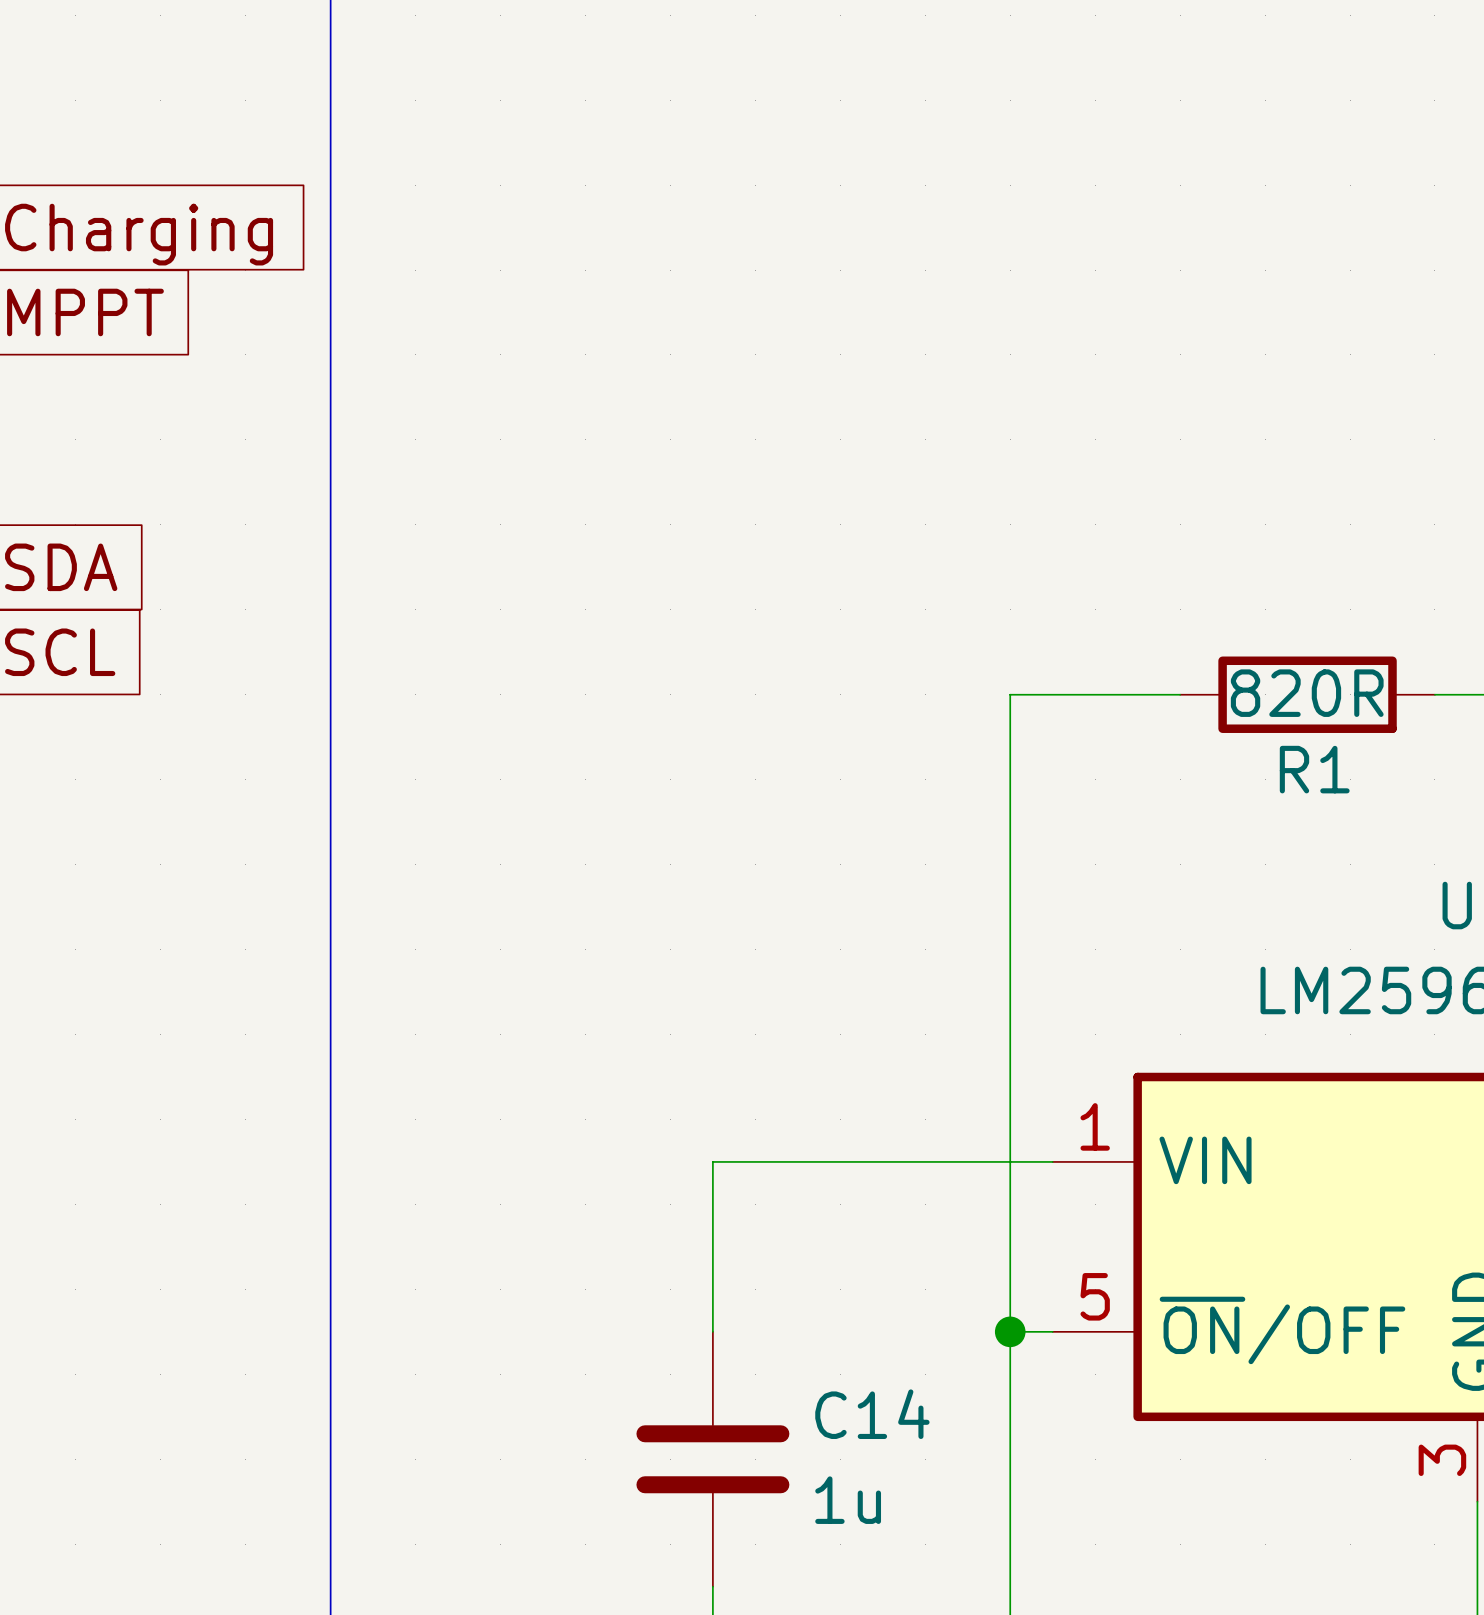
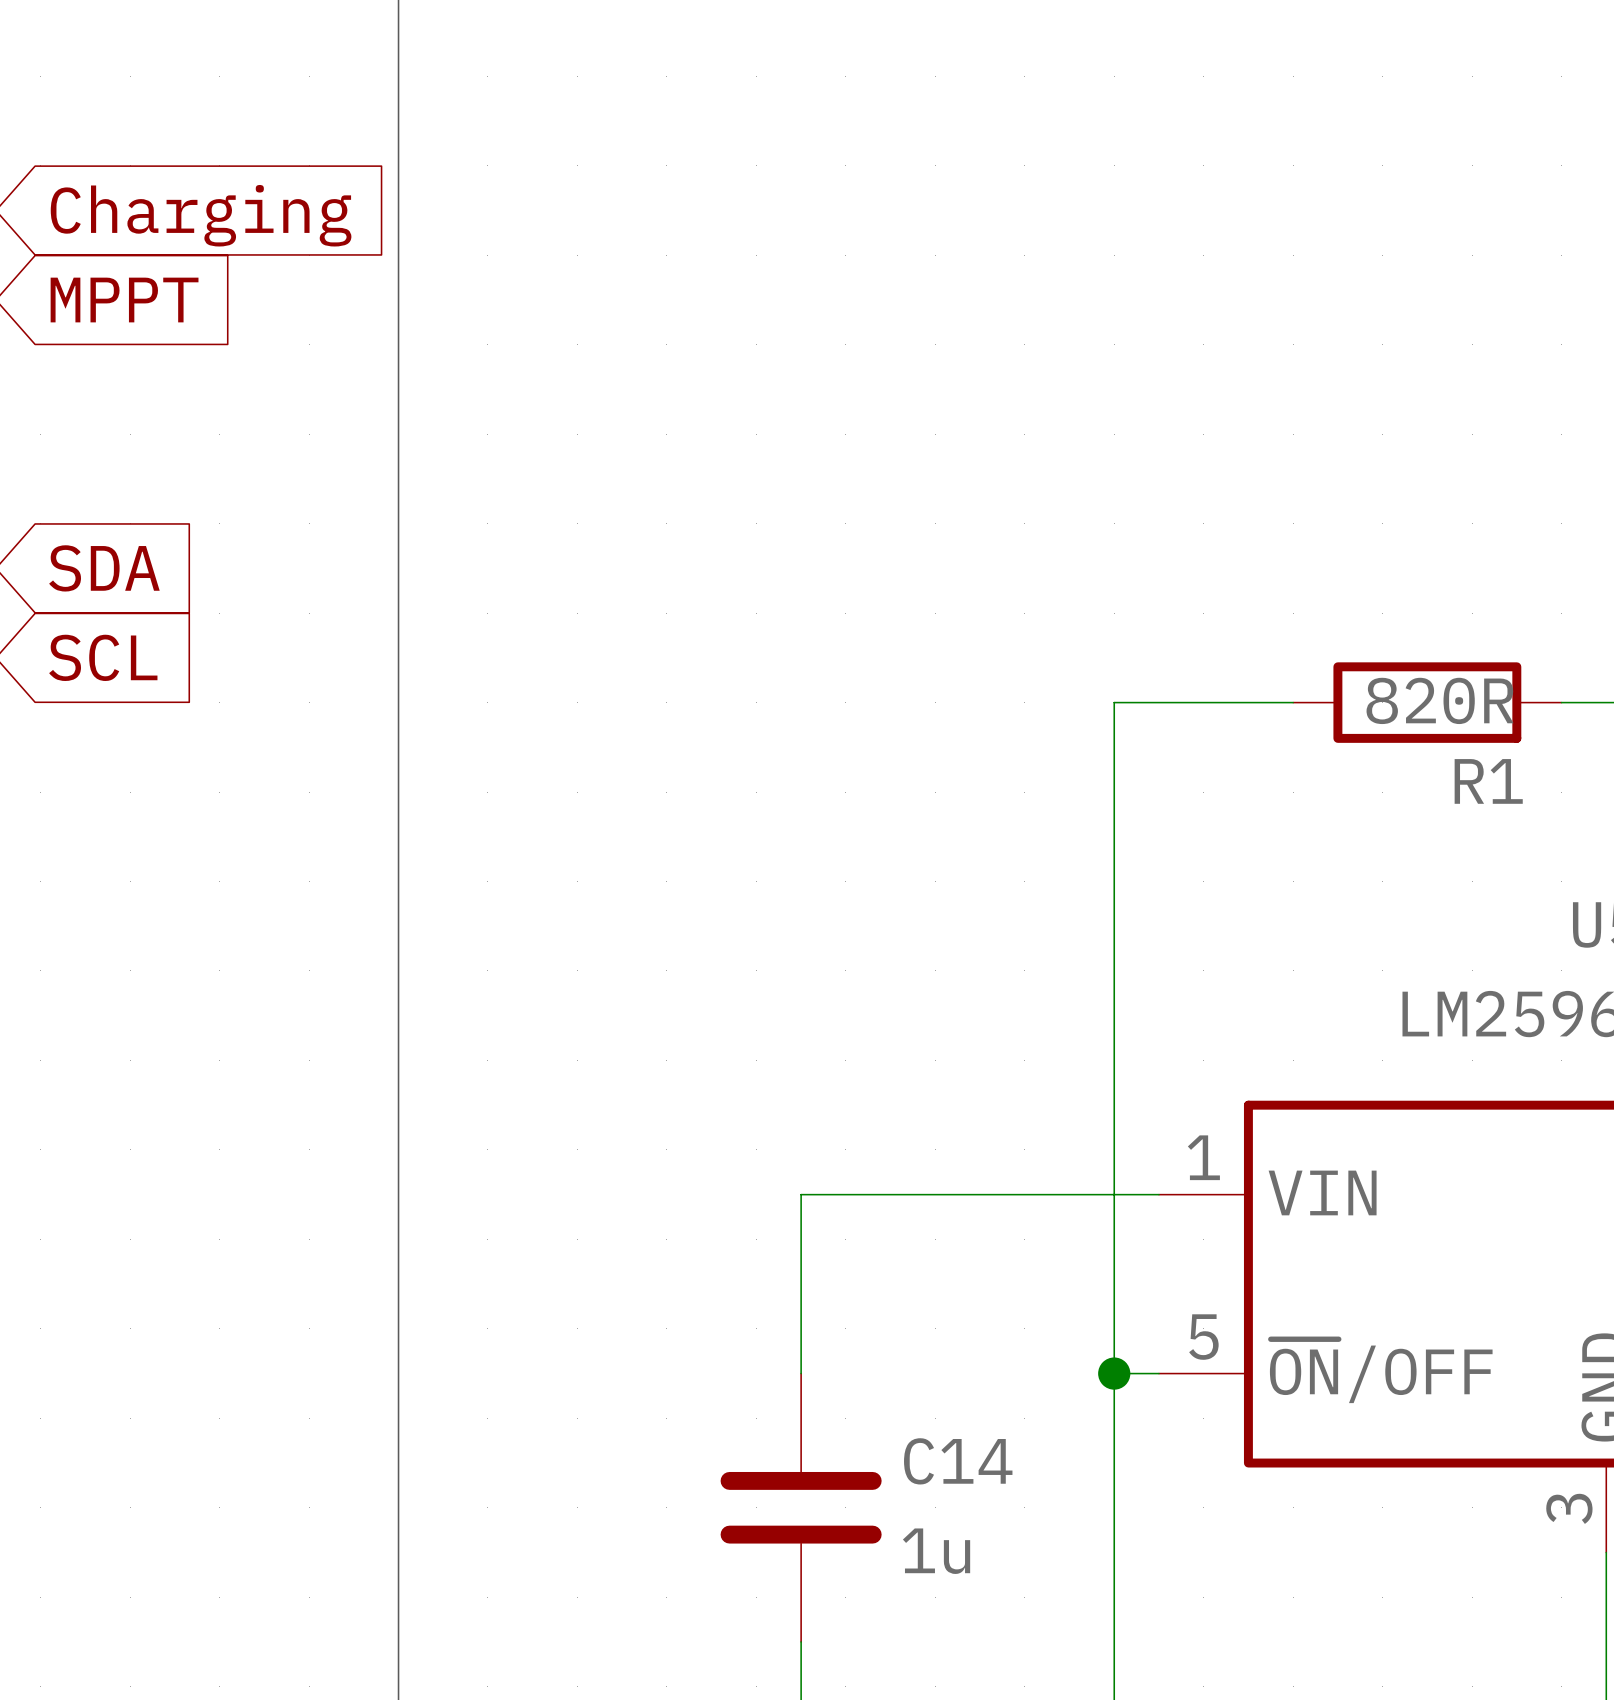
R1 name position: R1 (1314, 769) -> R1 (1488, 781)

